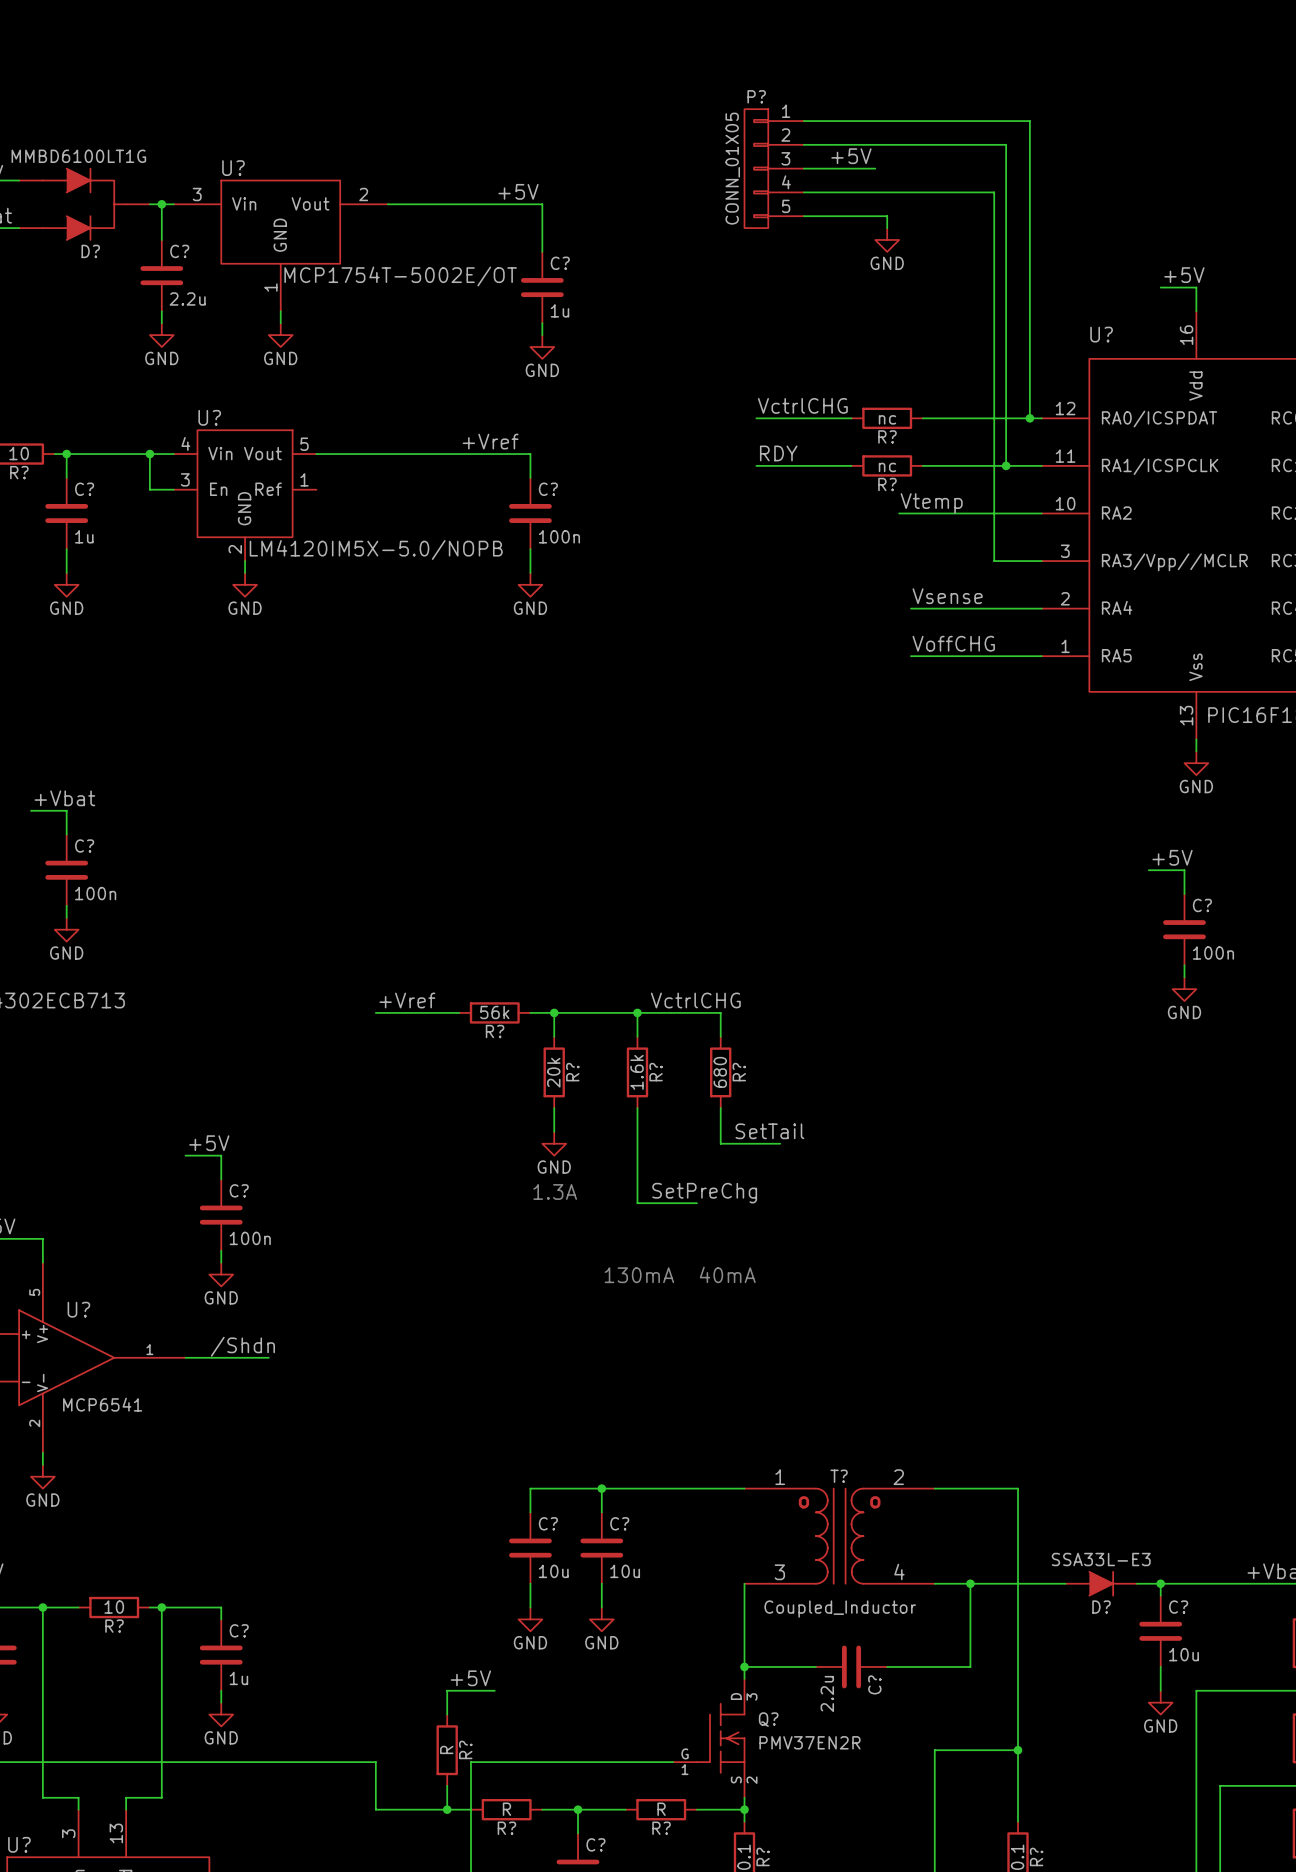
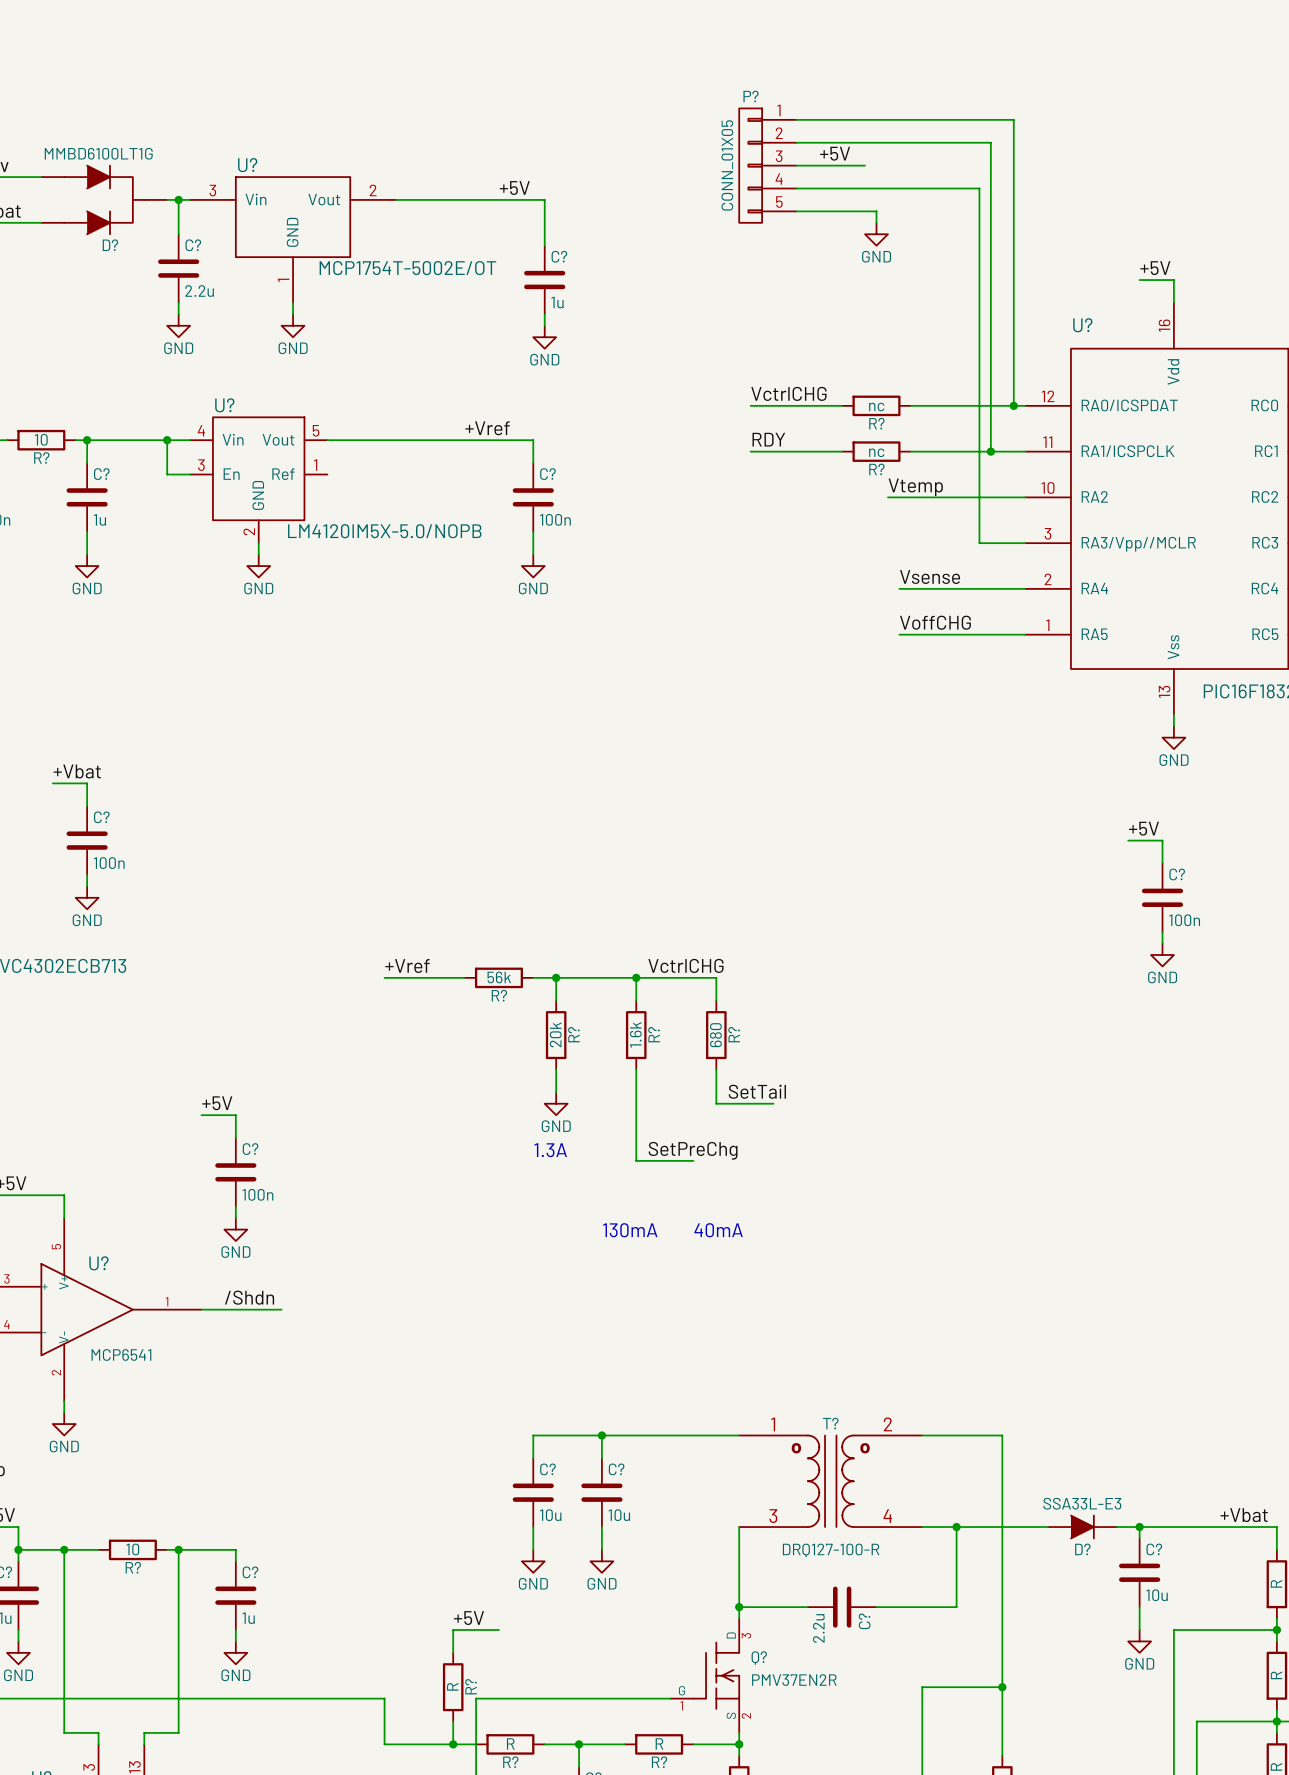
T? value: Coupled_Inductor (840, 1609) -> DRQ127-100-R (831, 1550)

